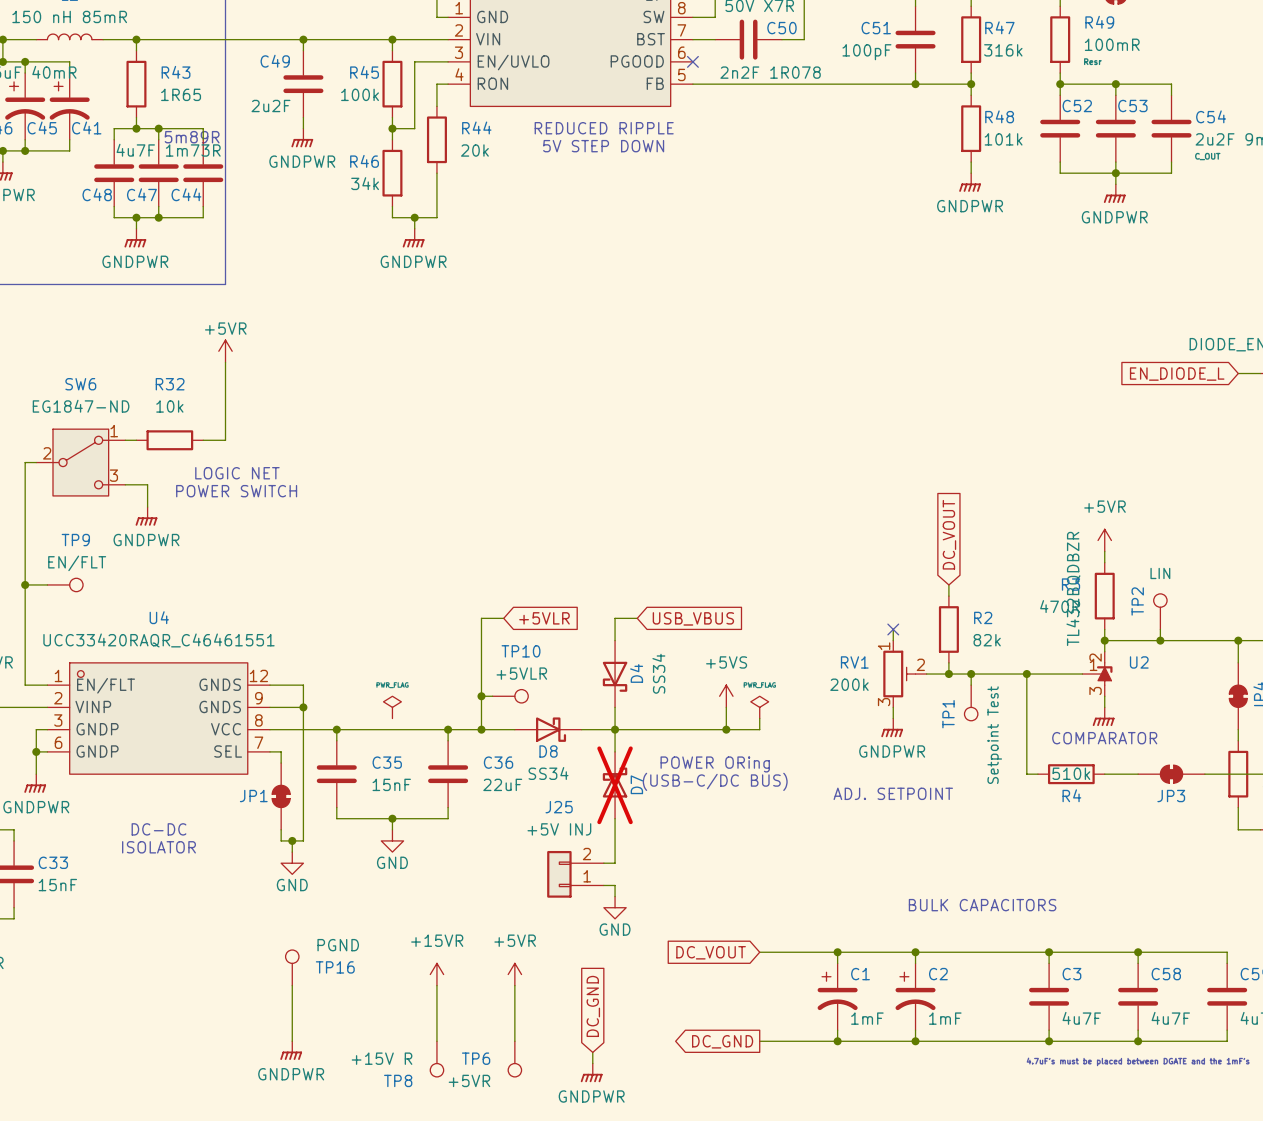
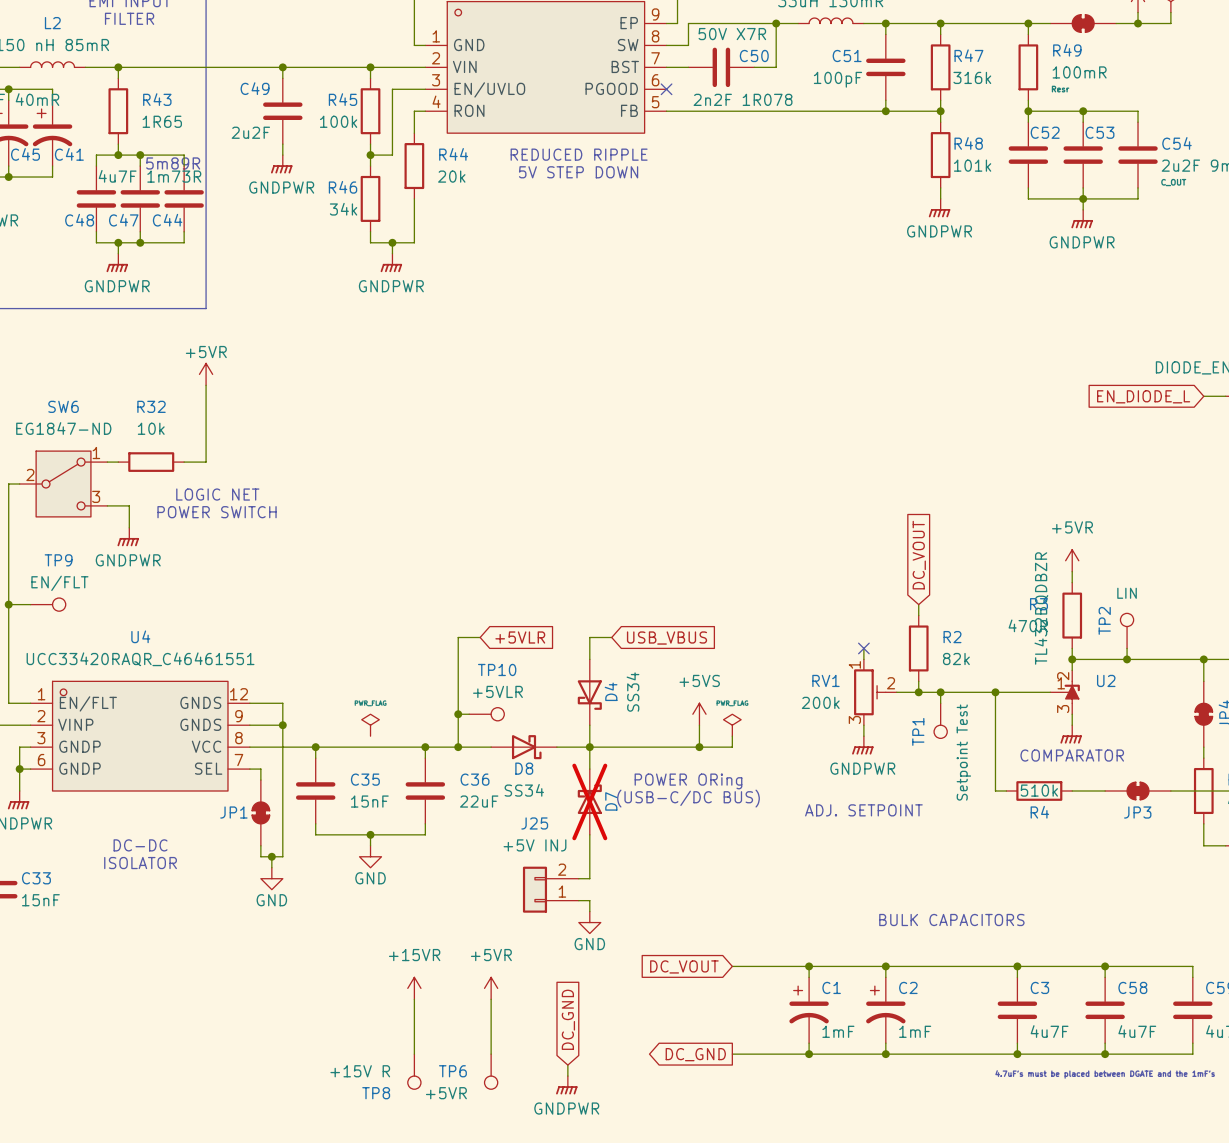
TP16: PGND (292, 967) -> none
wire: (292, 985) (292, 1041) -> none
power symbol: GNDPWR (291, 1050) -> none

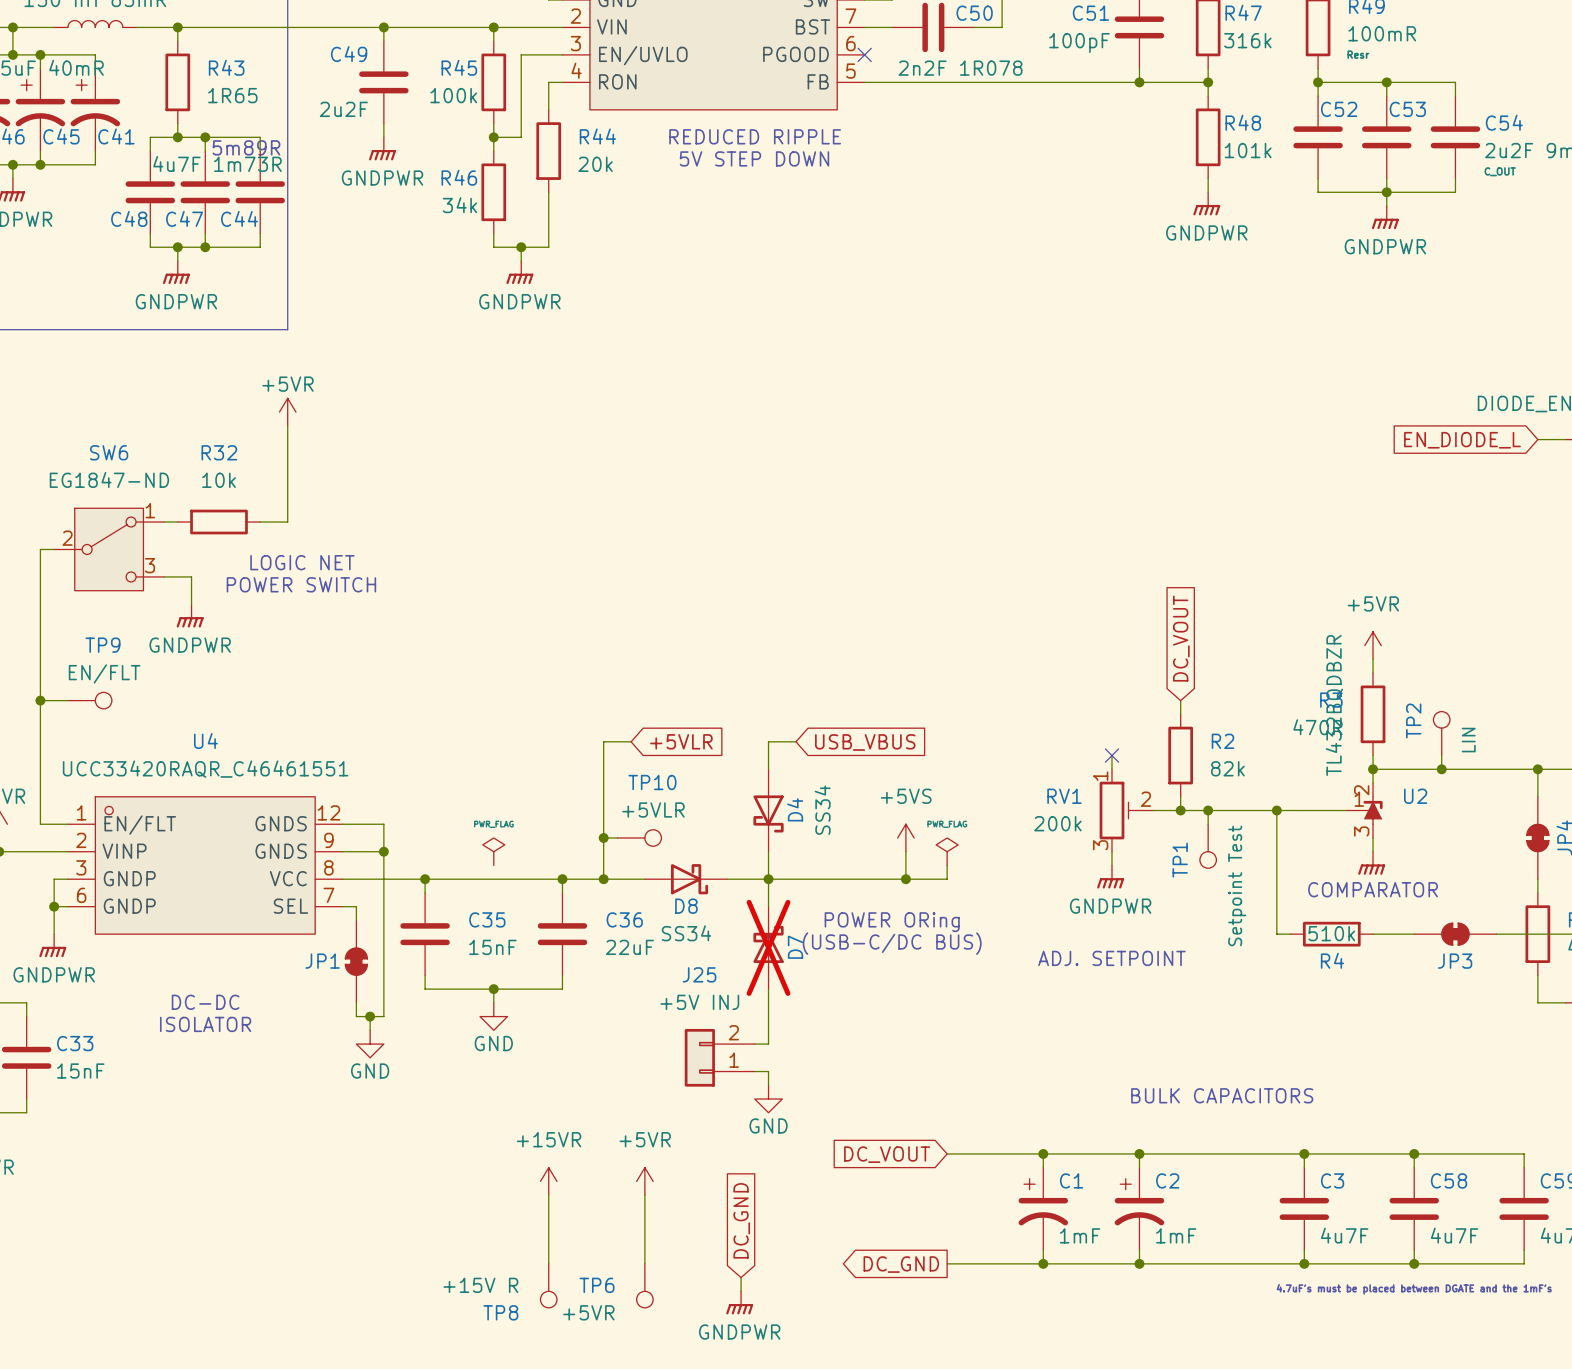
TP2 value rotation: 0° (1127, 593) -> 90° counterclockwise (1468, 740)
TP2 value position: LIN (1127, 593) -> LIN (1468, 740)

